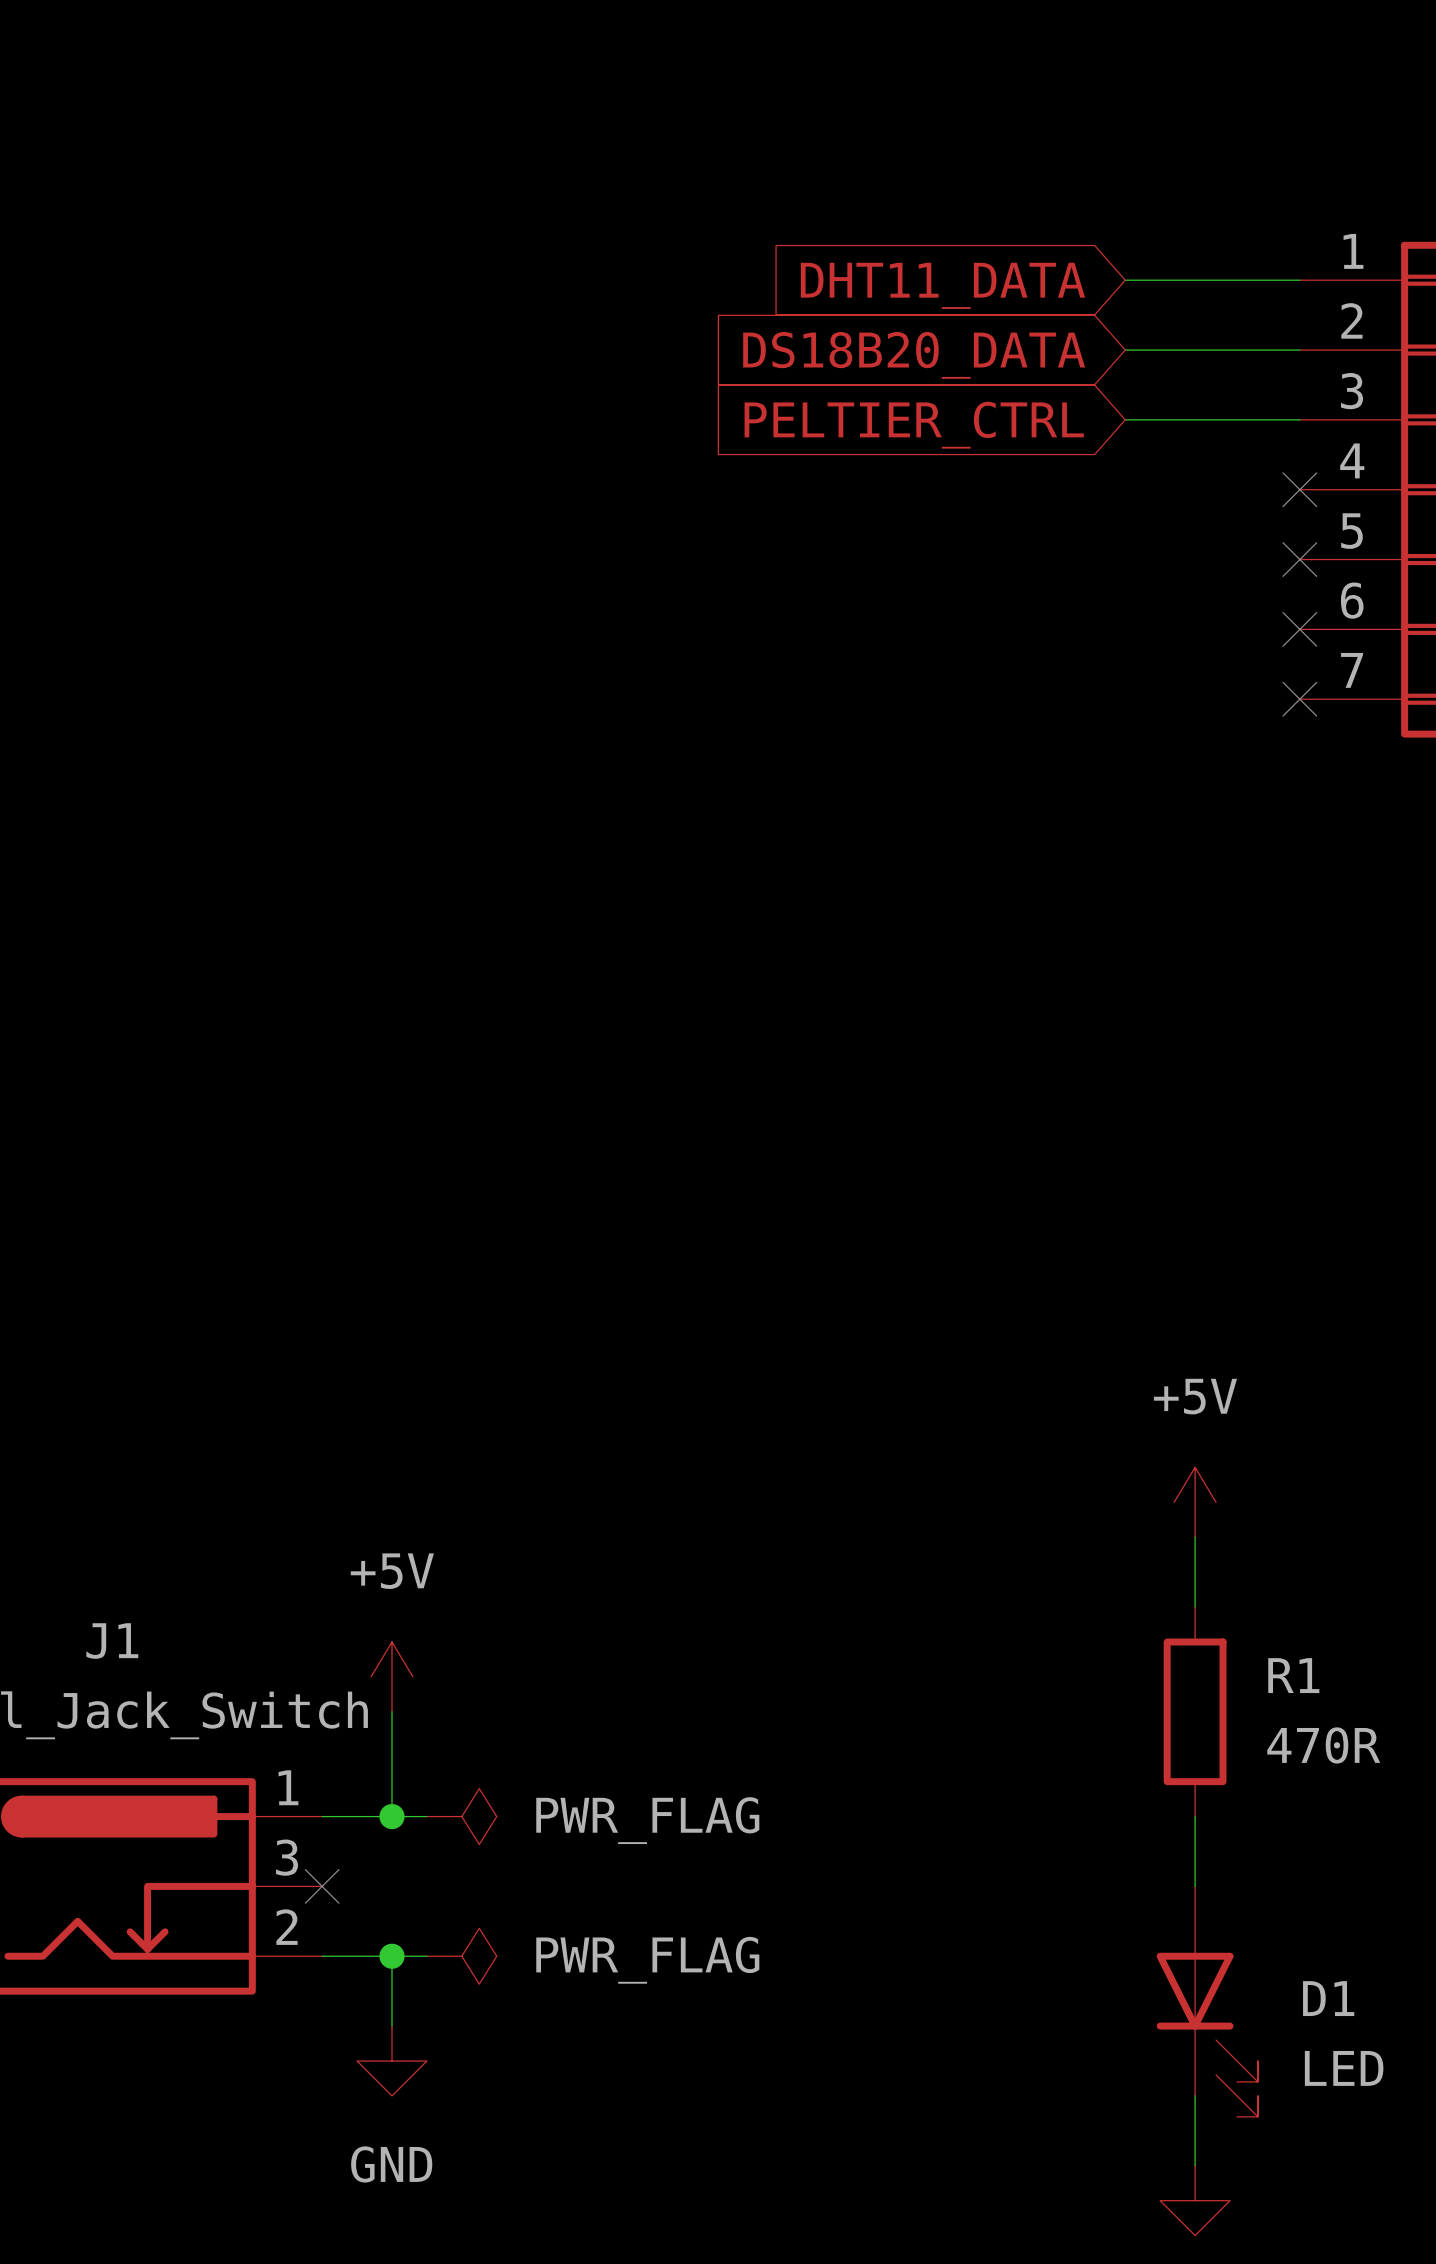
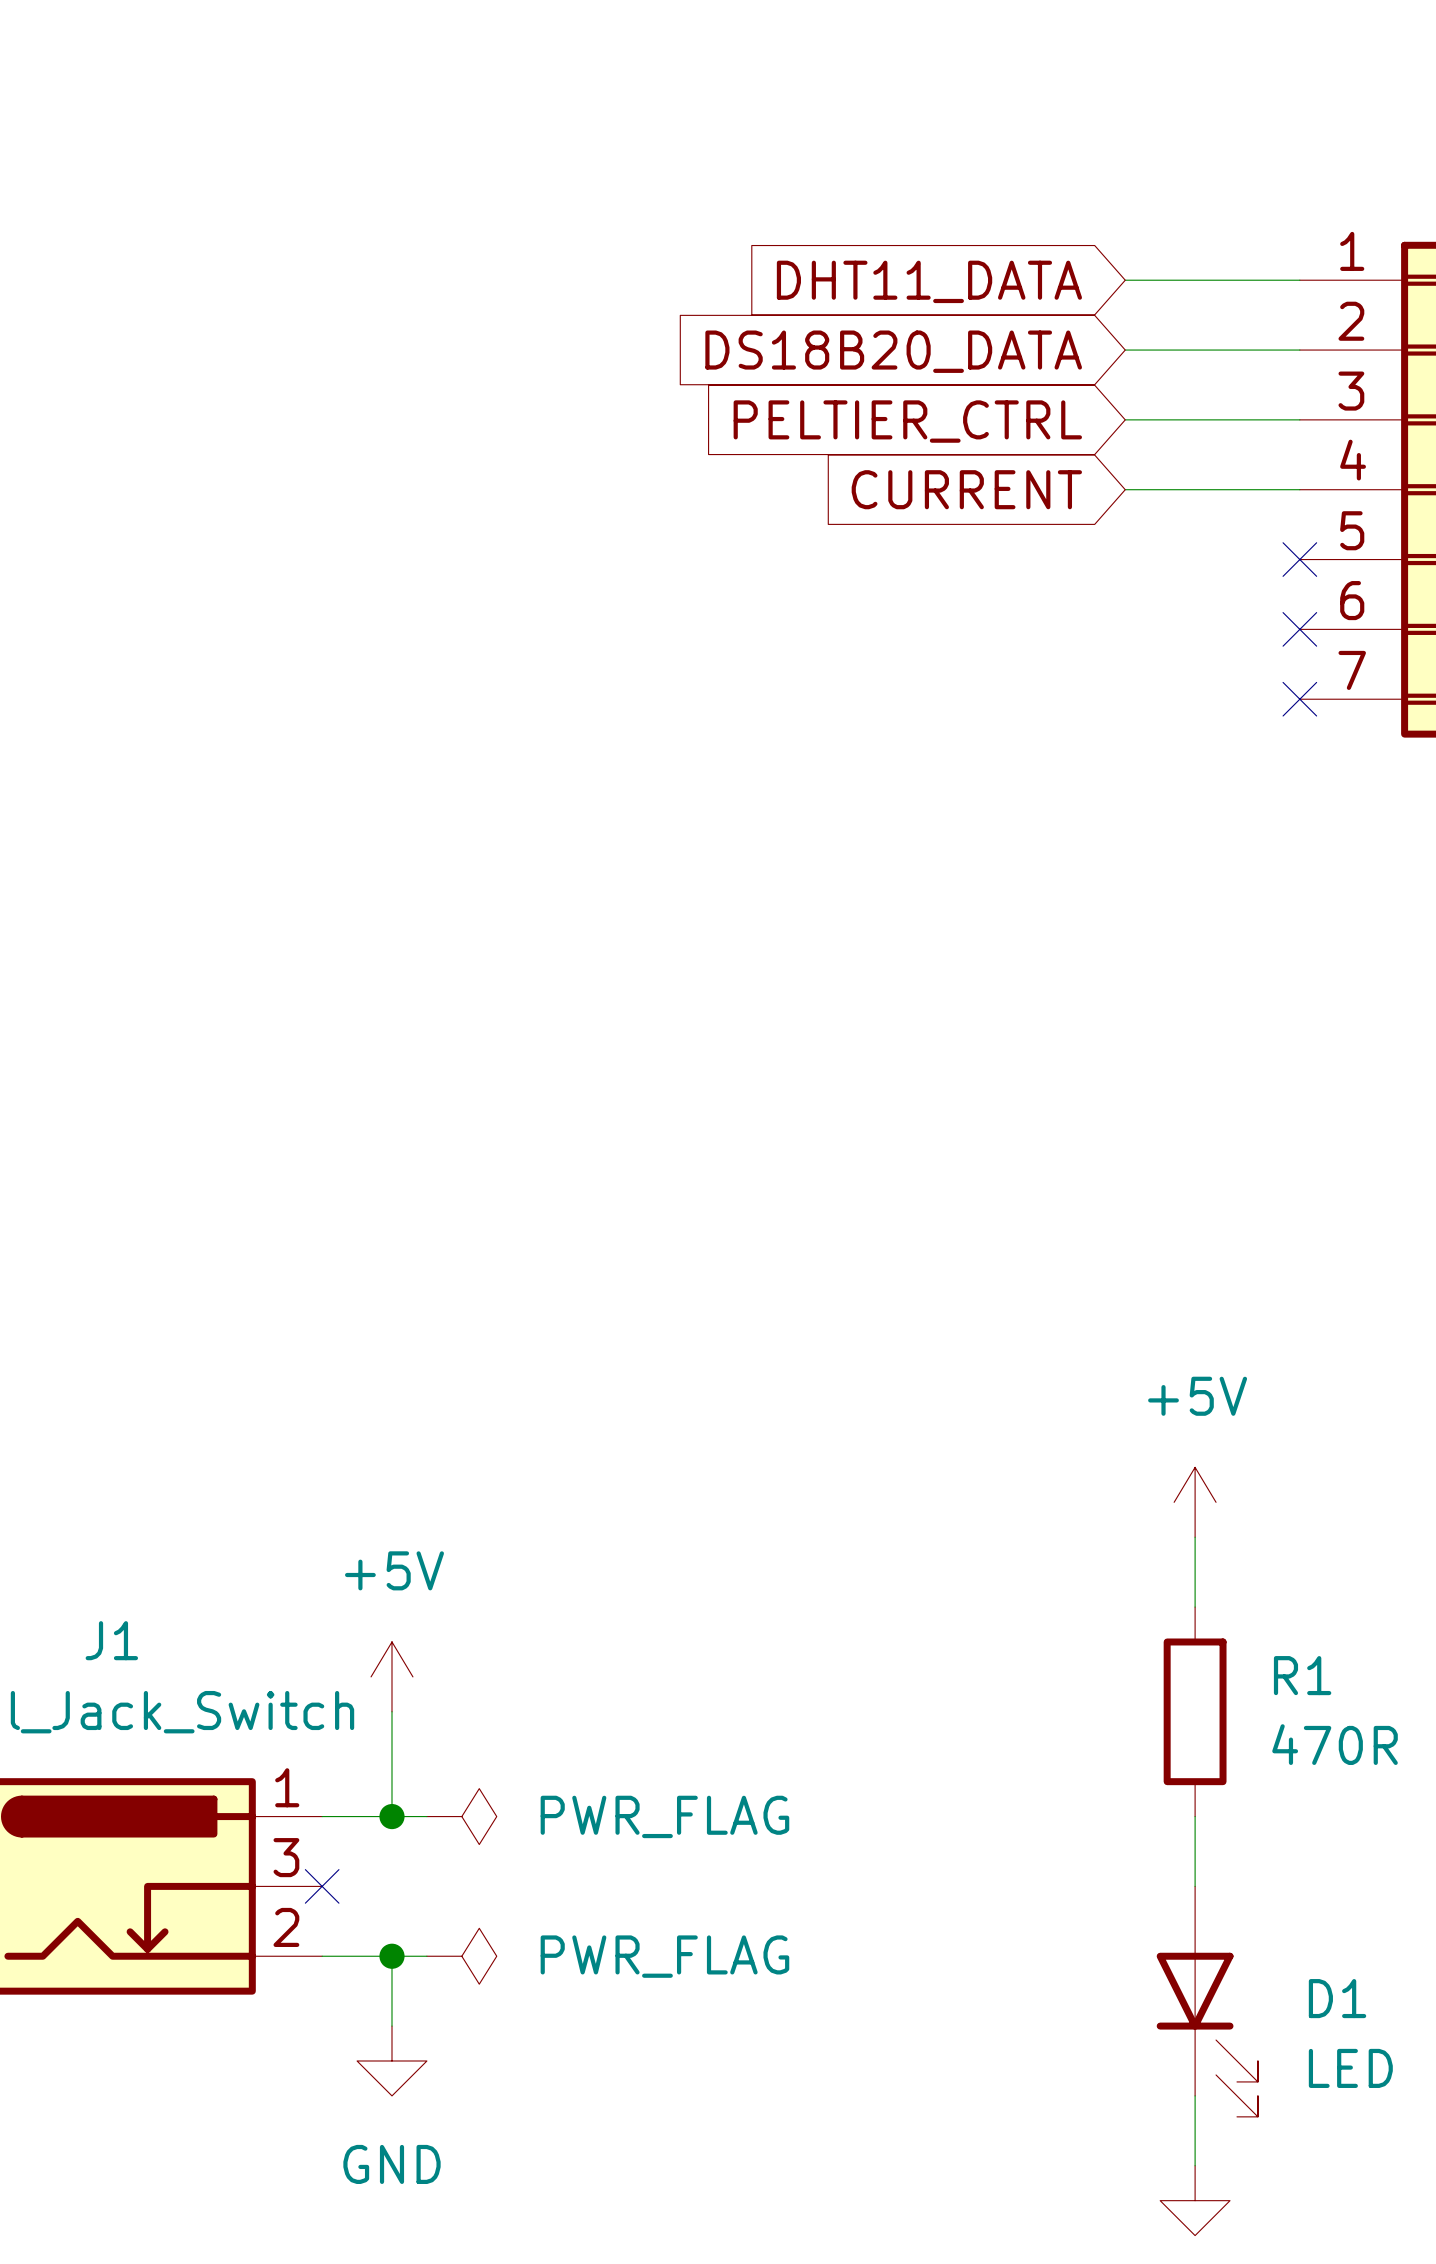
global label: none -> CURRENT (966, 489)
wire: none -> (1125, 489) (1299, 489)
no-connect mark: (1299, 489) -> none

